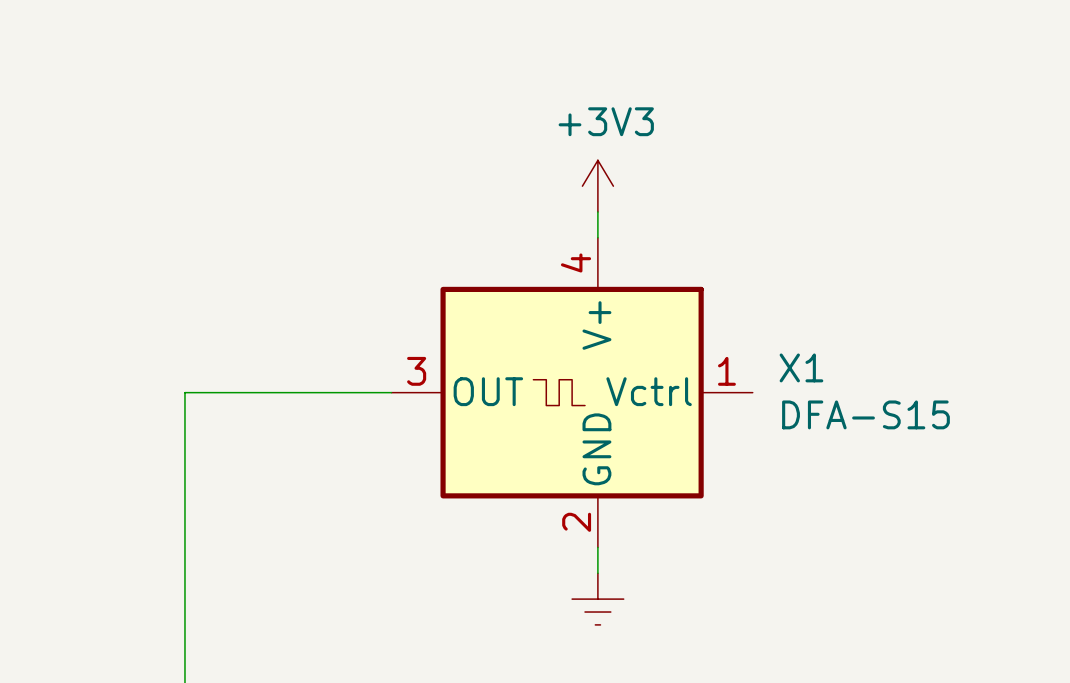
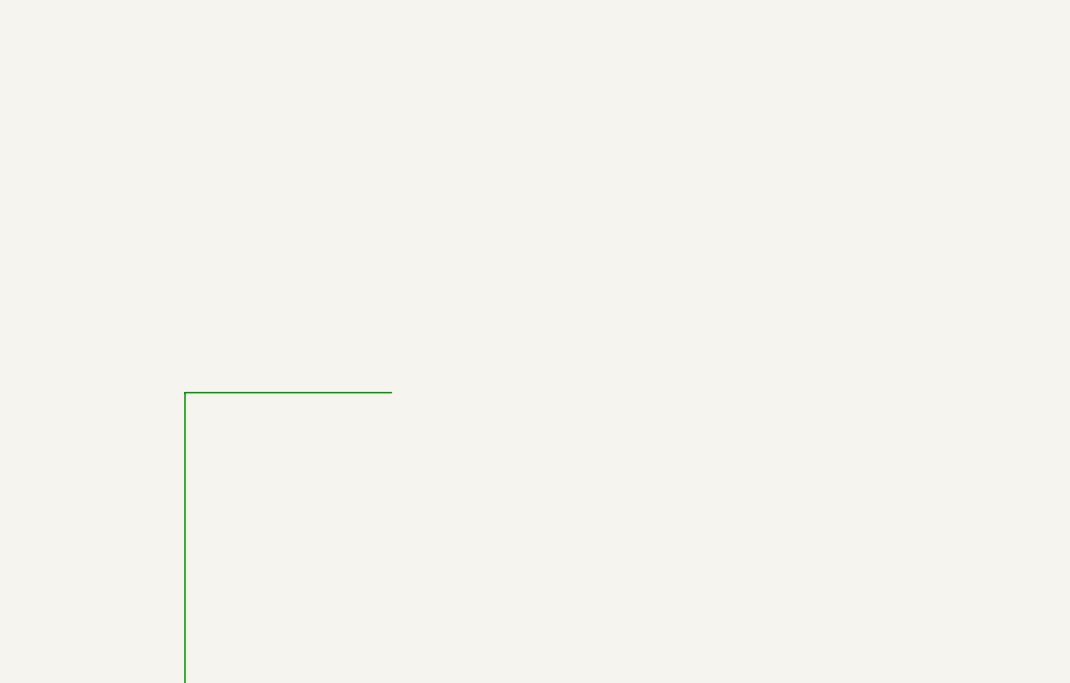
power symbol: +3V3 (597, 186) -> none
wire: (597, 211) (597, 237) -> none
X1: DFA-S15 (572, 392) -> none
wire: (597, 547) (597, 573) -> none
power symbol: (597, 599) -> none

